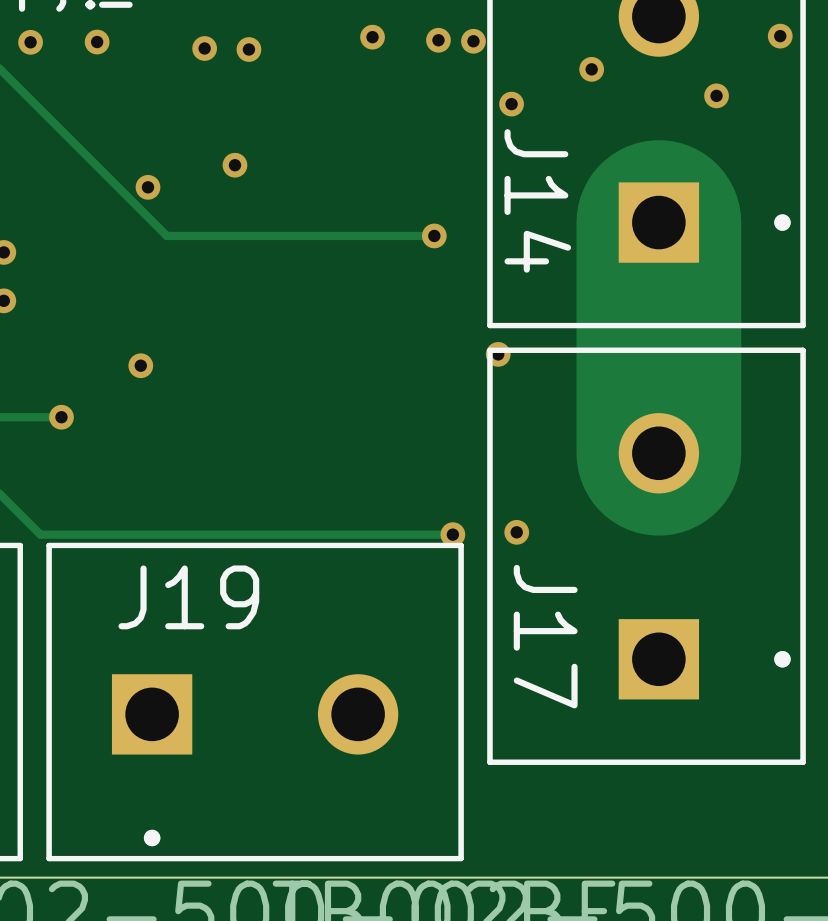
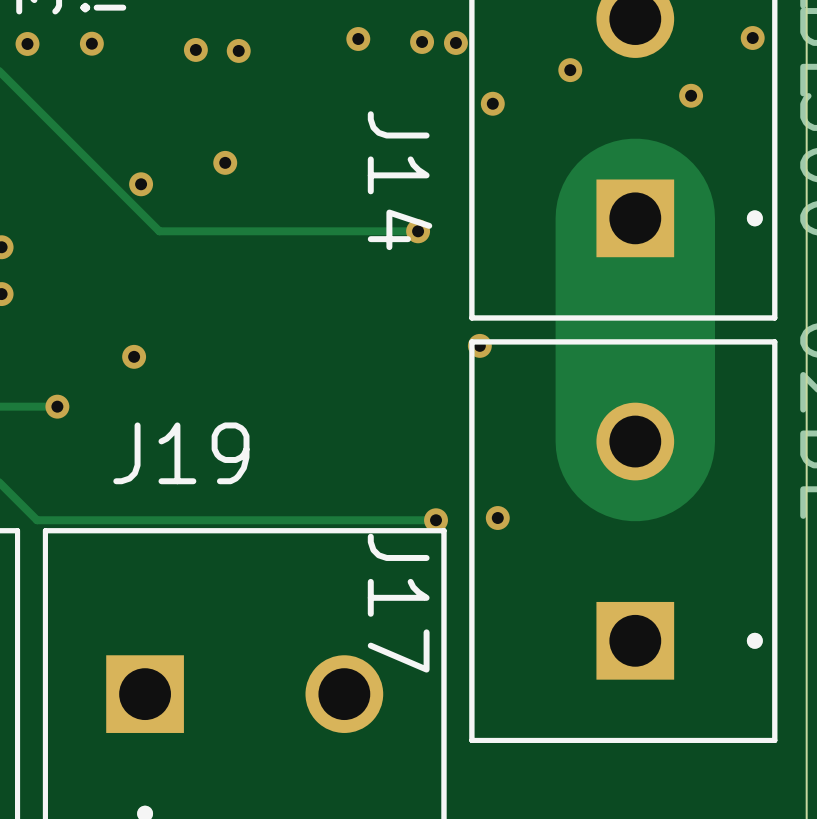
J14 name position: J14 (537, 200) -> J14 (400, 180)
J19 name position: J19 (188, 597) -> J19 (181, 453)
J17 name position: J17 (545, 636) -> J17 (398, 603)

